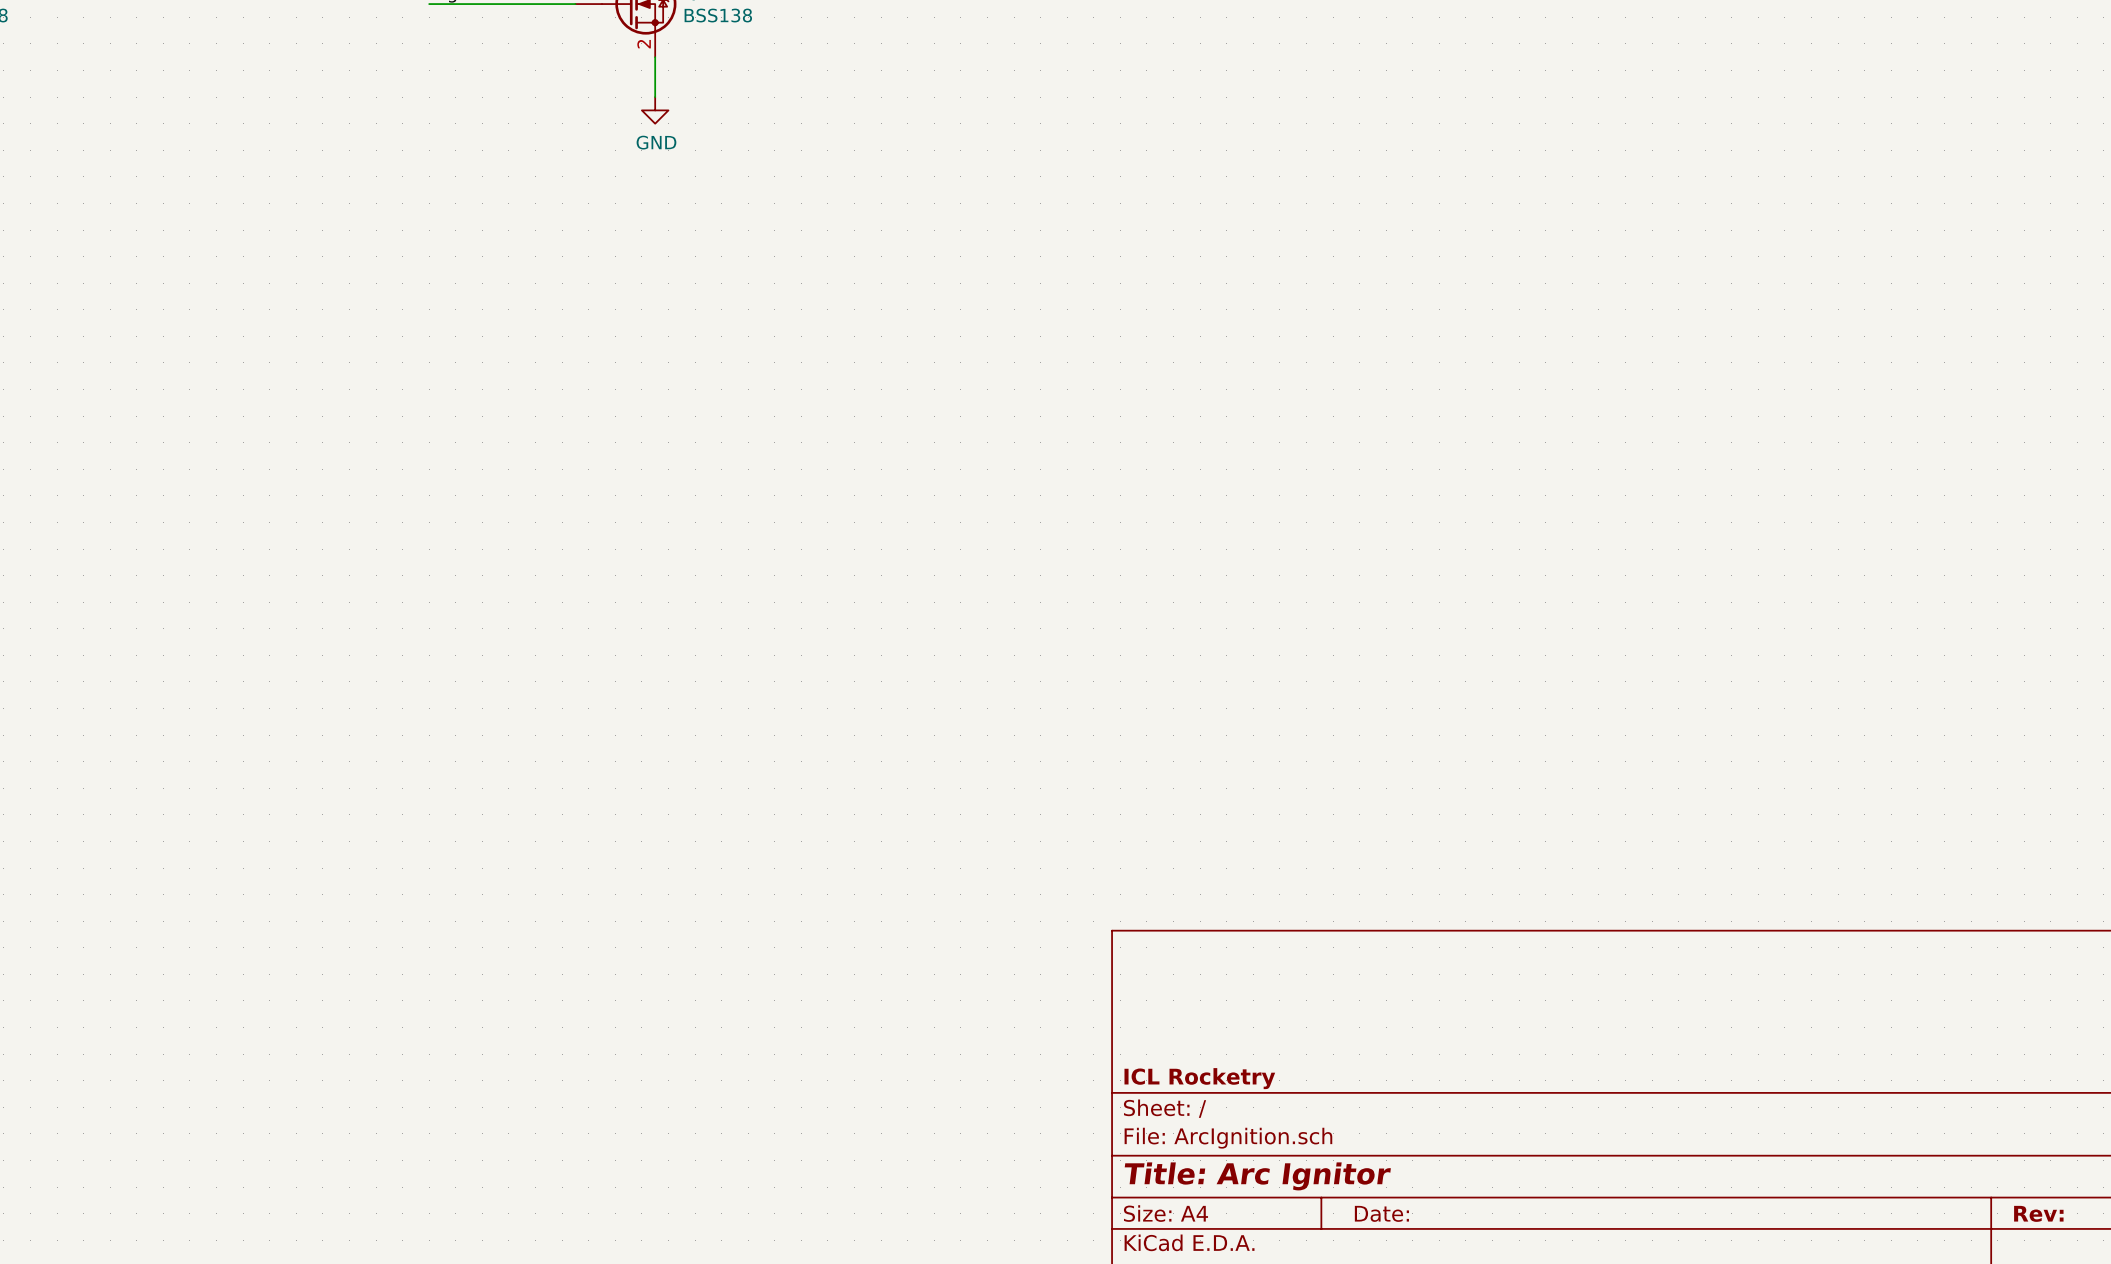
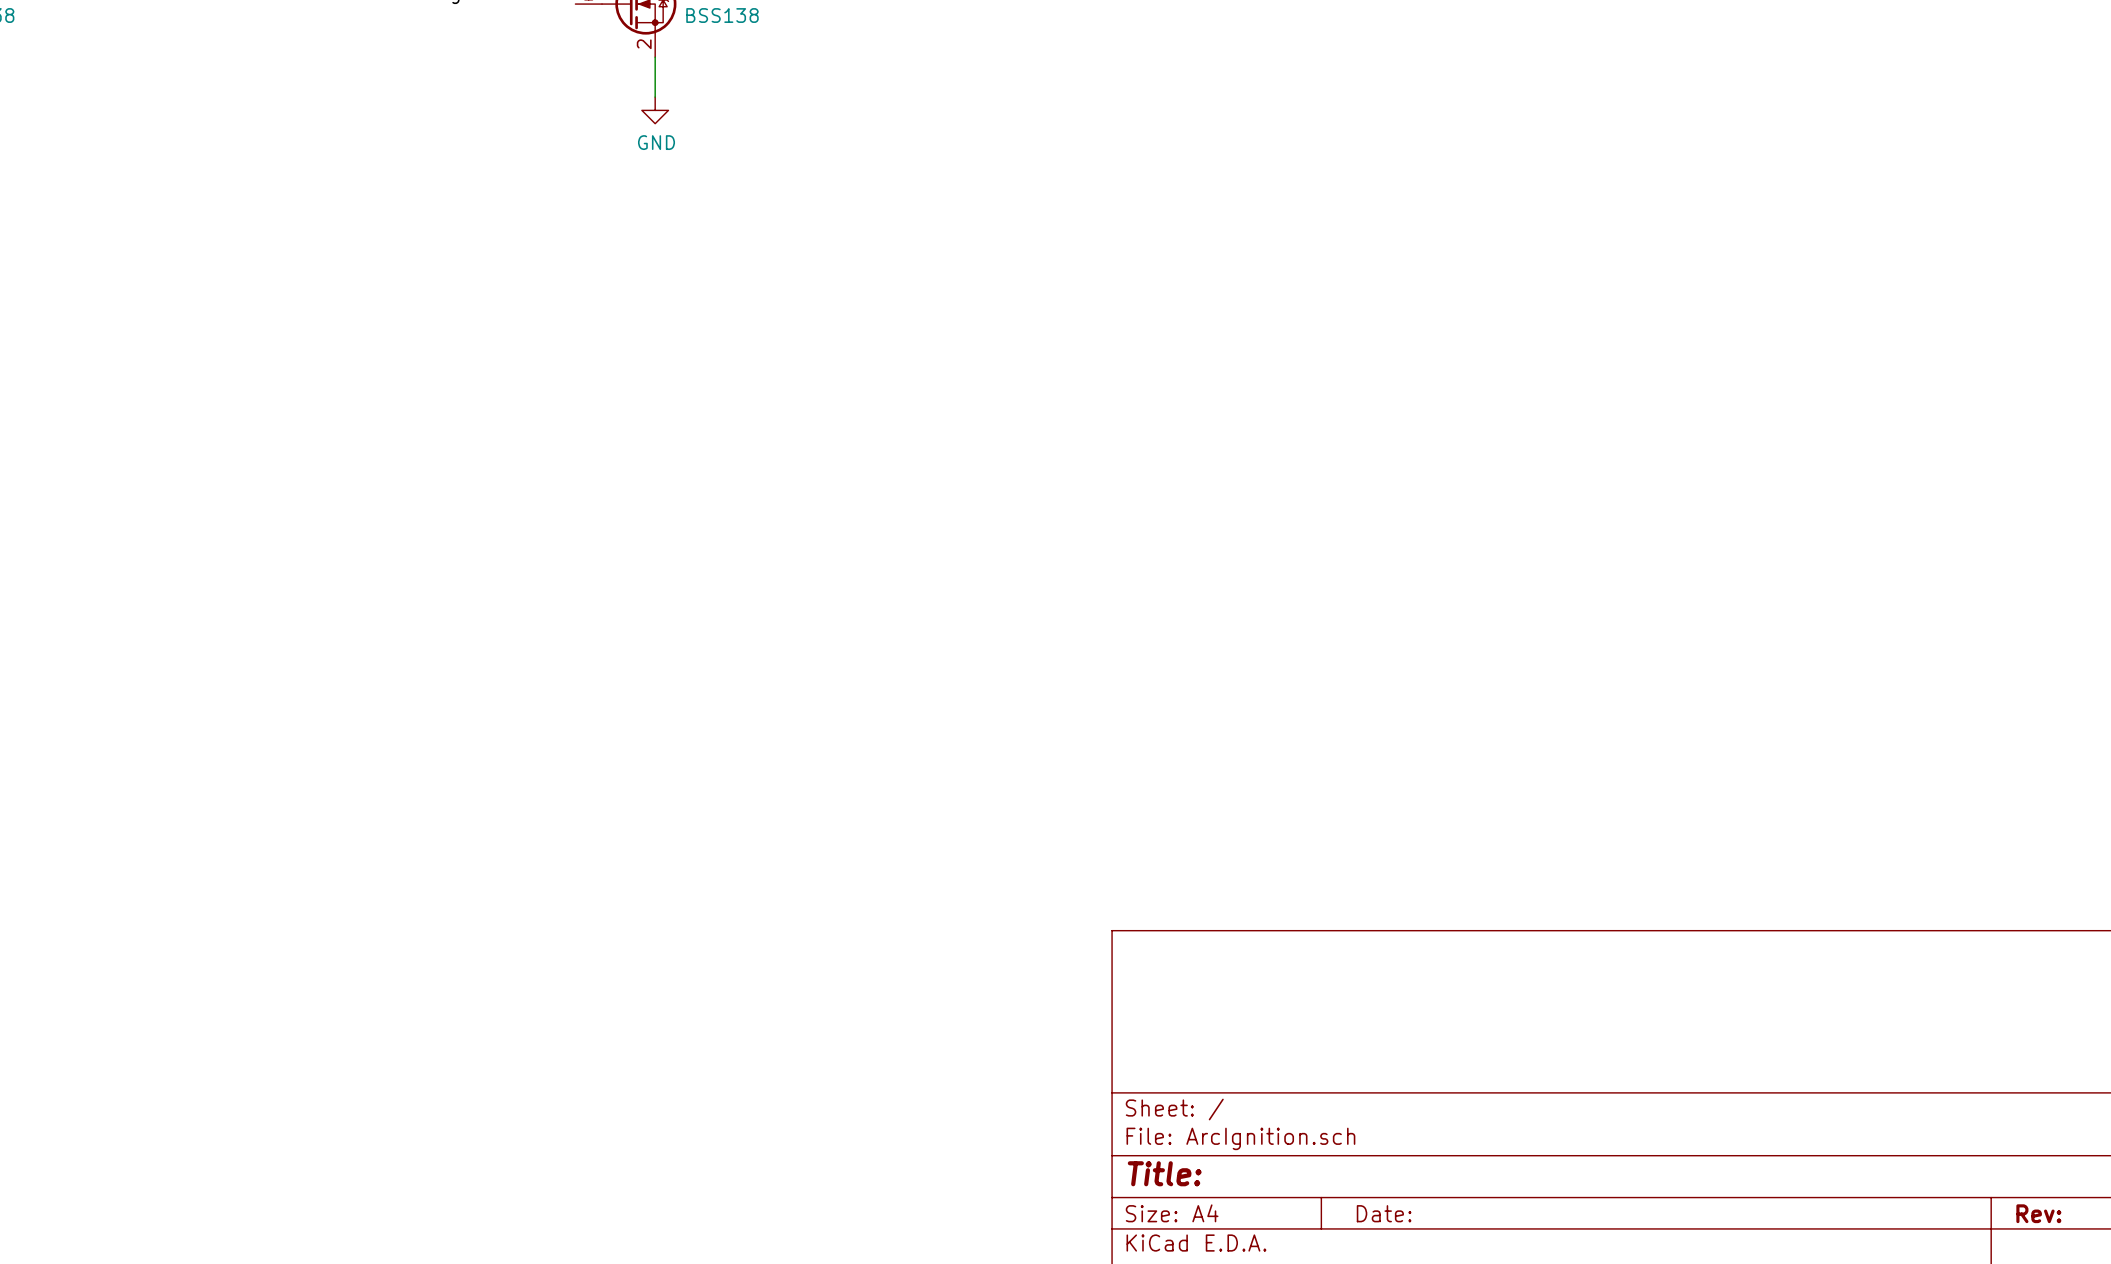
wire: (429, 4) (575, 4) -> none
title block: ICL Rocketry (1199, 1078) -> none
title block: Title: Arc Ignitor (1257, 1176) -> Title: (1164, 1173)

